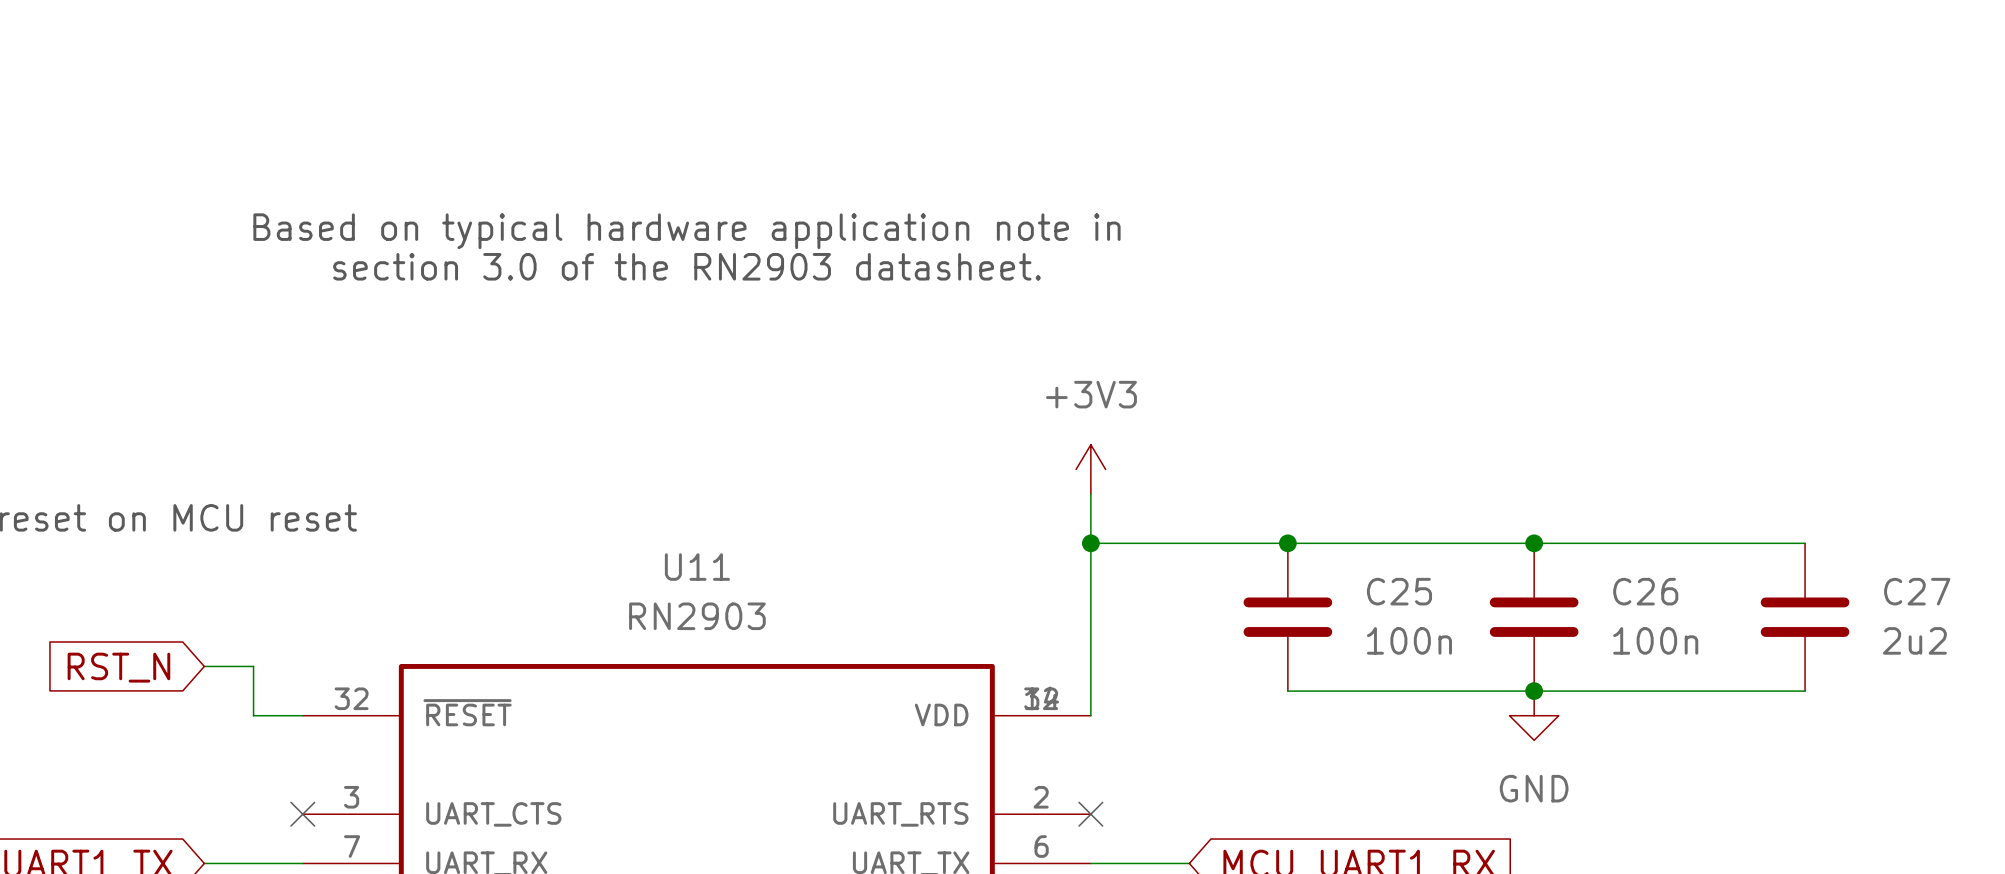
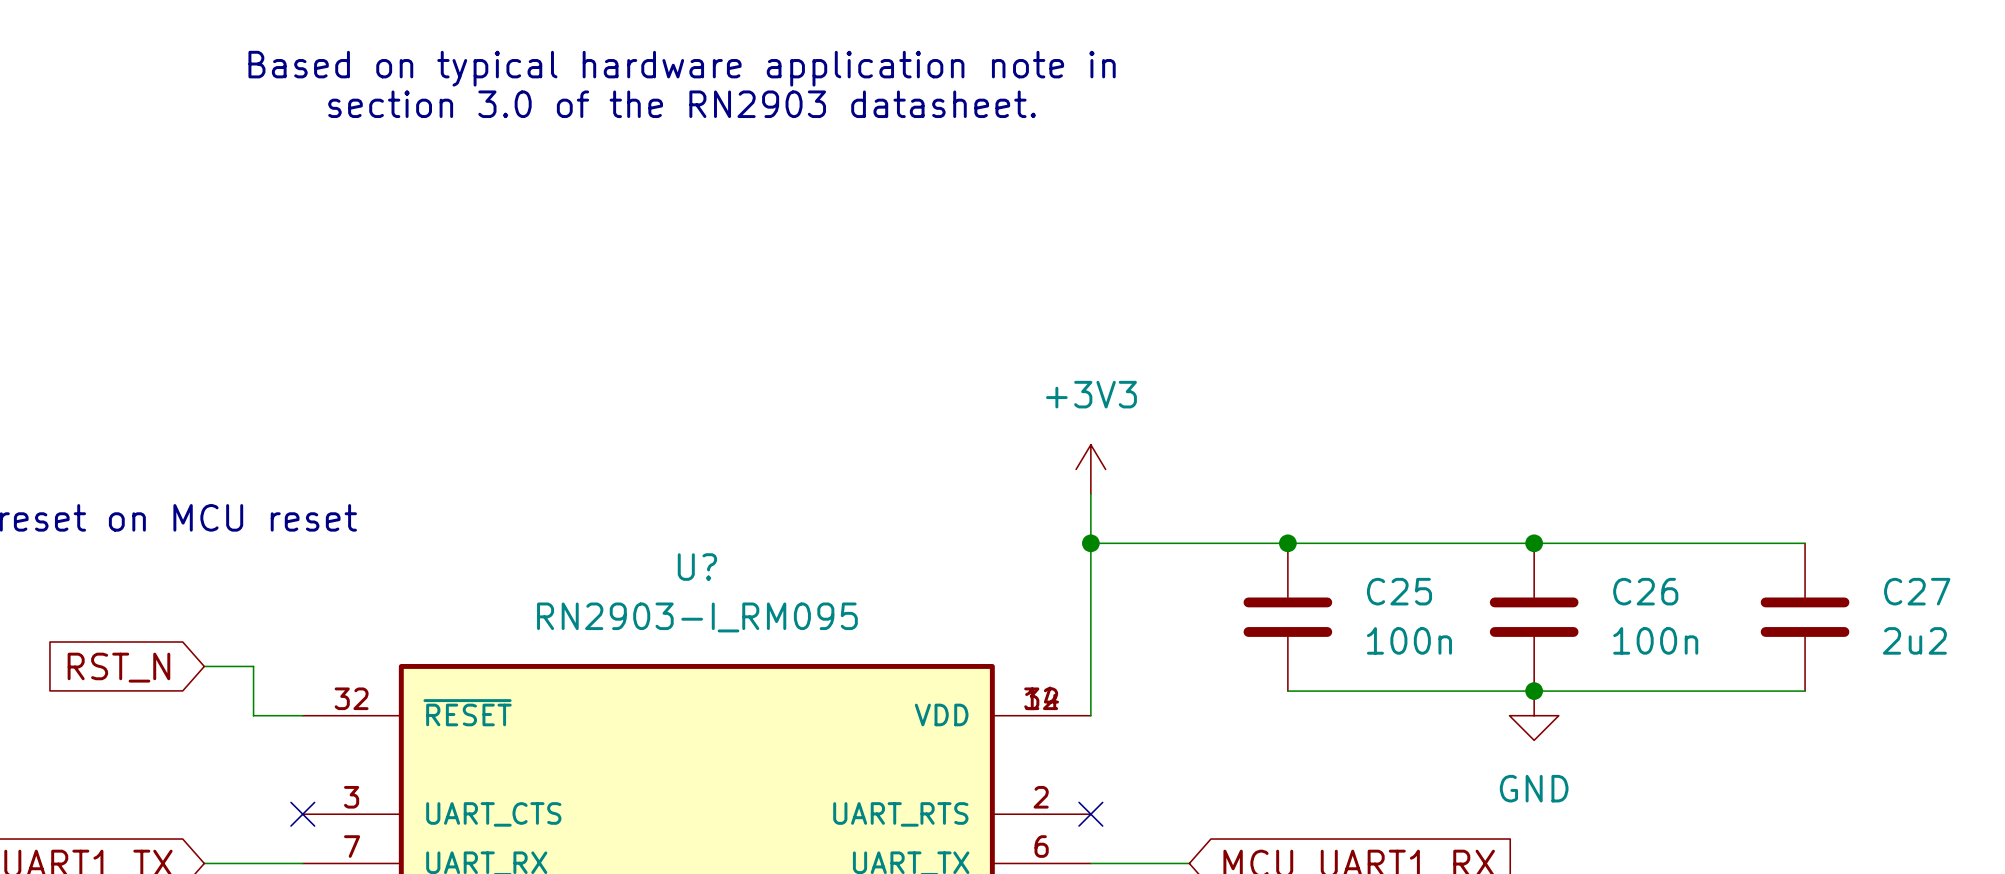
text position: Based on typical hardware application note in (686, 231) -> Based on typical hardware application note in (682, 68)
text position: section 3.0 of the RN2903 datasheet. (686, 266) -> section 3.0 of the RN2903 datasheet. (682, 104)
U11 name: U11 (697, 567) -> U? (697, 567)
U11 value: RN2903 (697, 616) -> RN2903-I_RM095 (697, 617)

